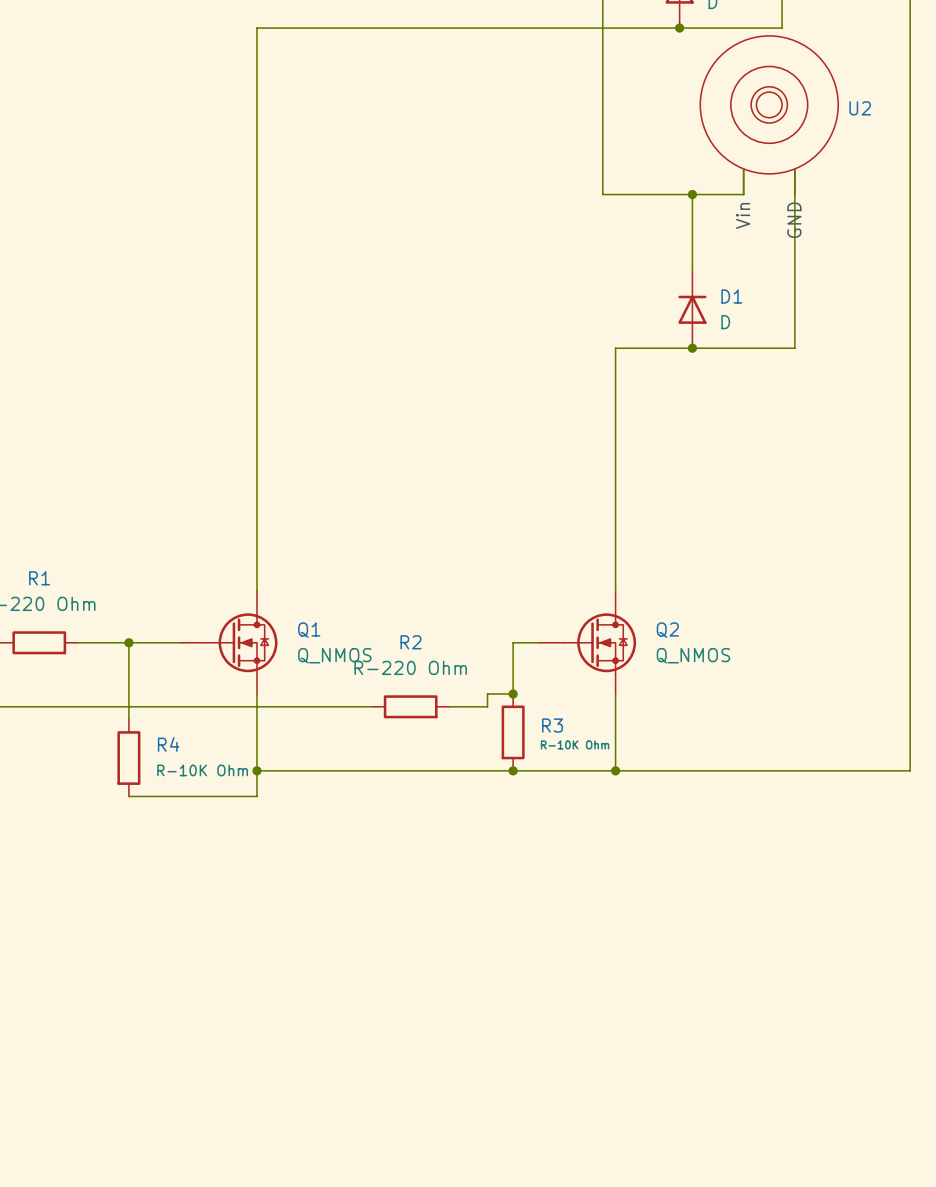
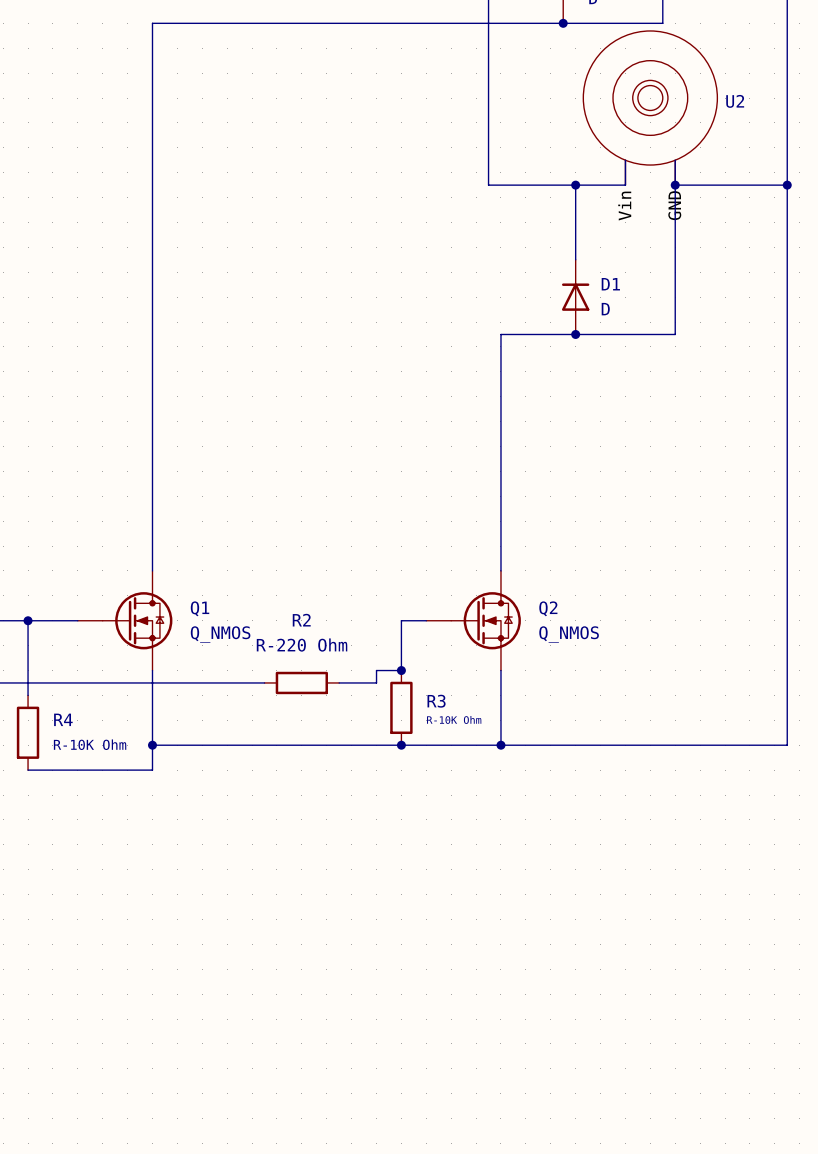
wire: none -> (675, 185) (787, 185)
junction: none -> (675, 185)
junction: none -> (787, 185)

